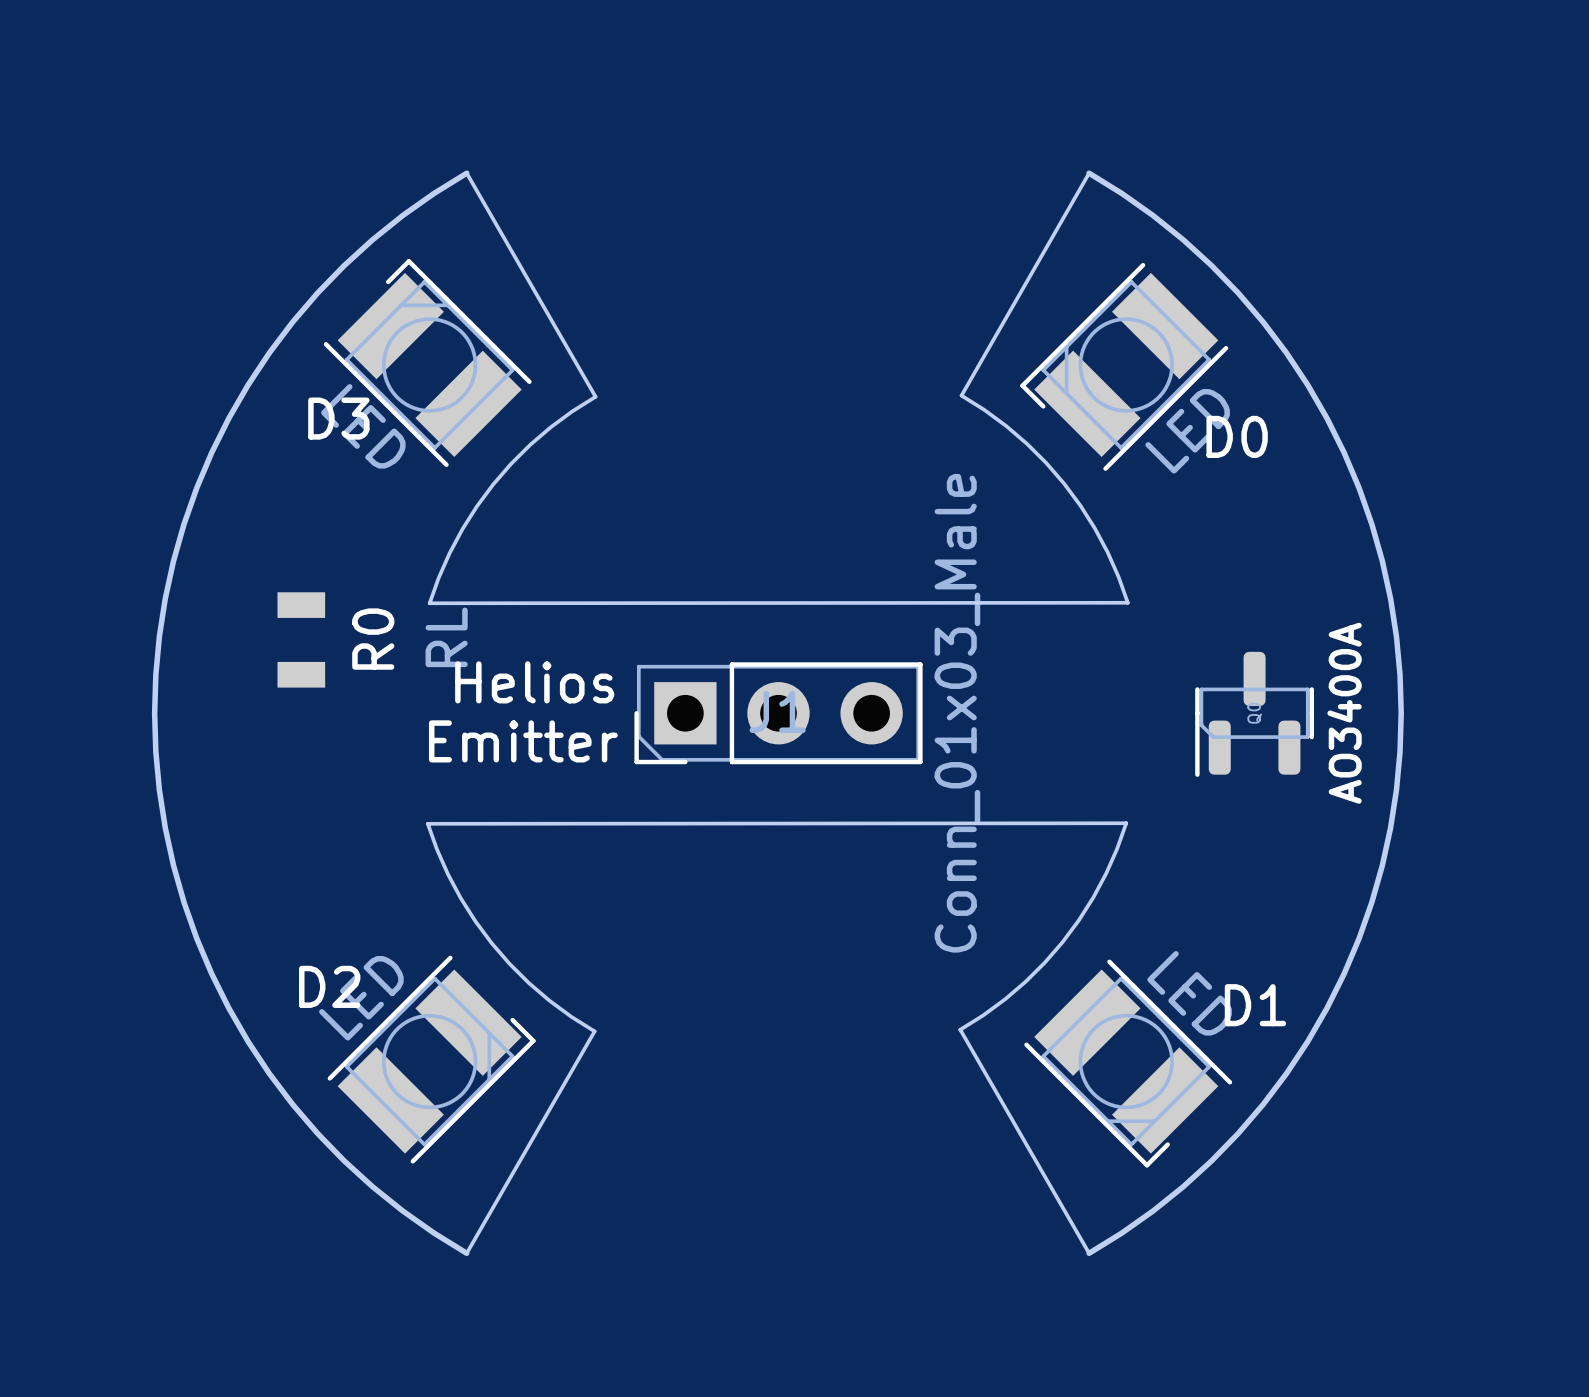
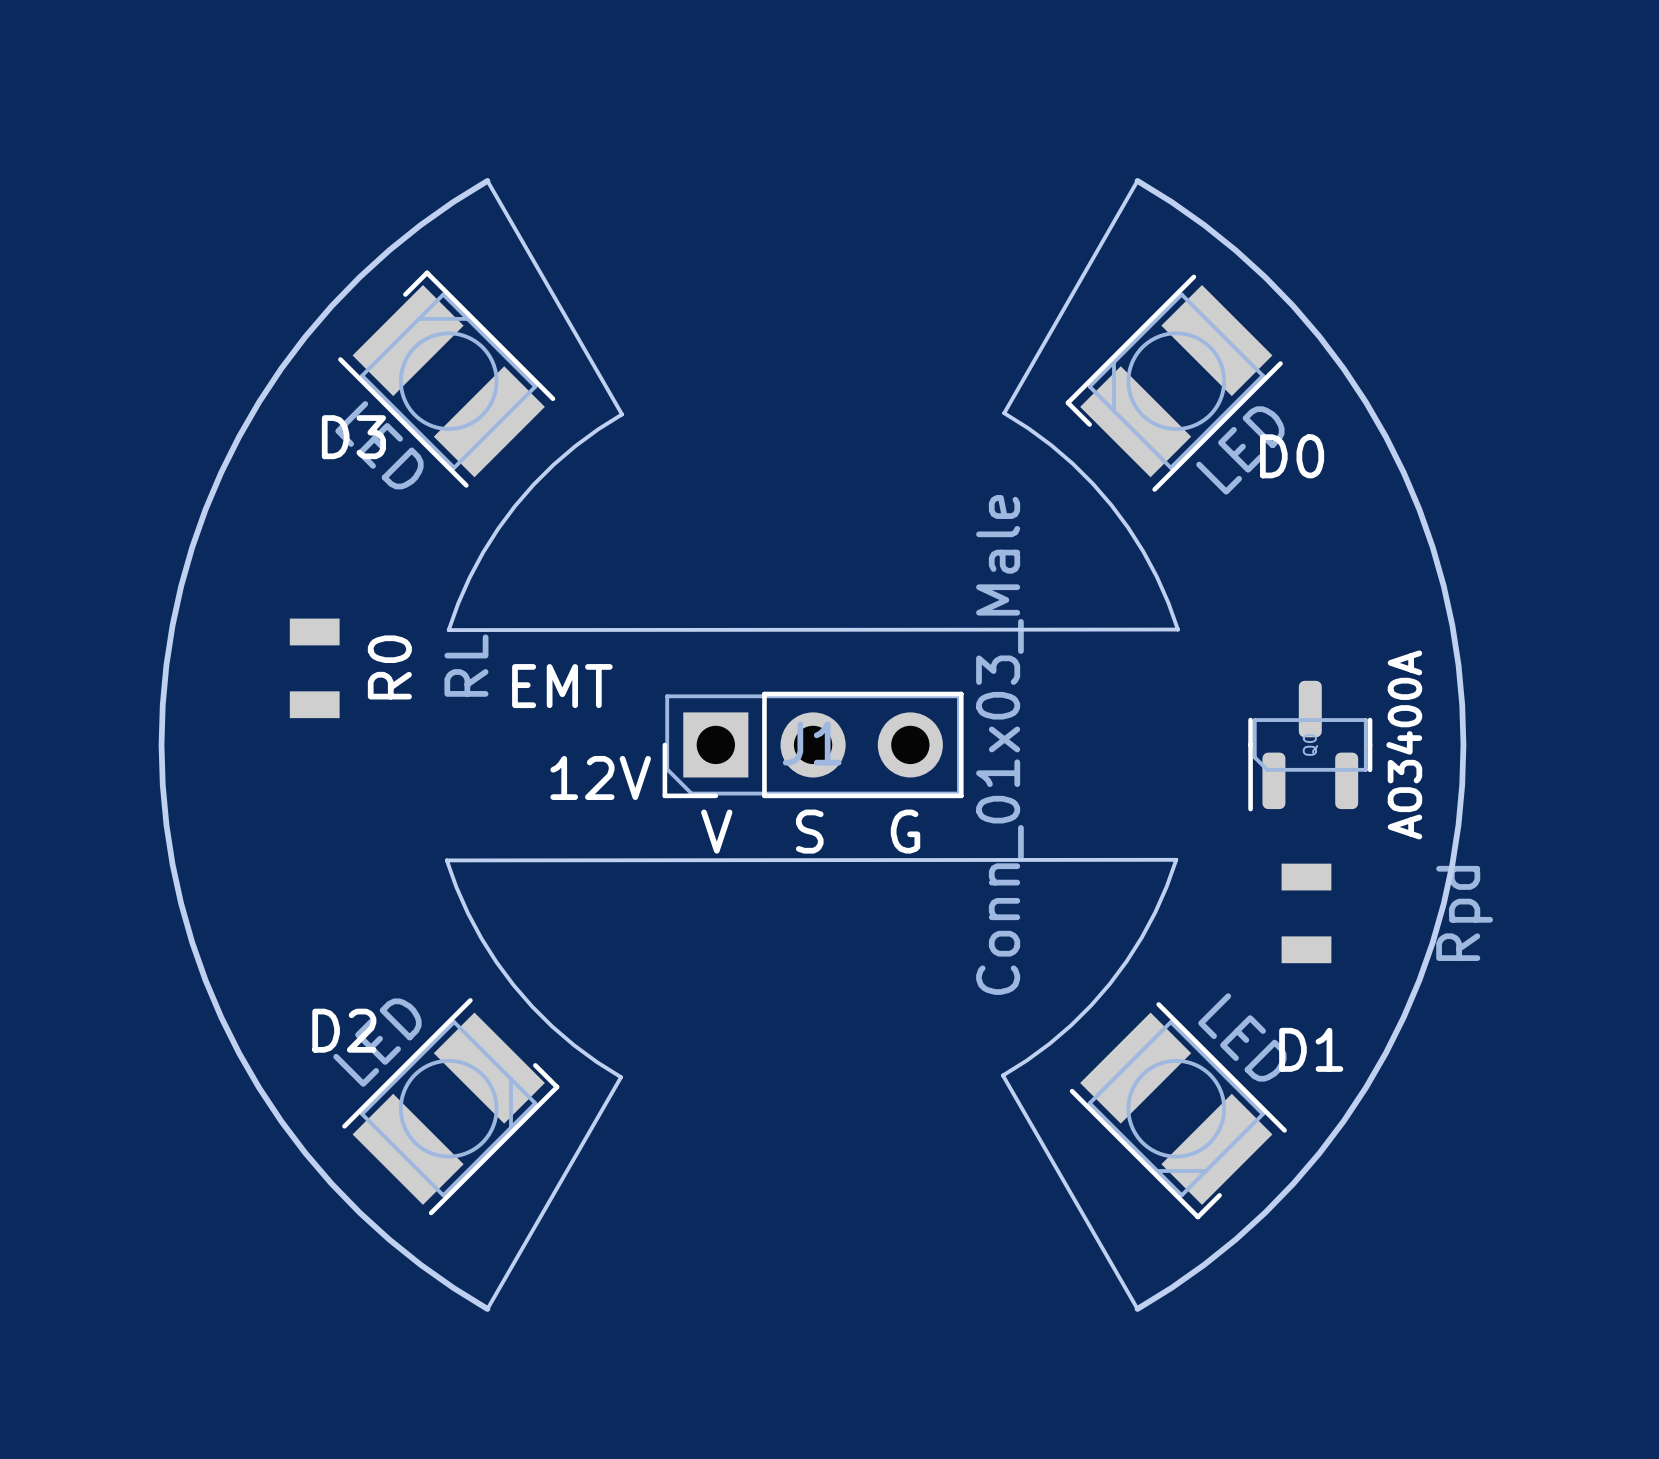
text: none -> EMT (562, 686)
text: Helios (534, 682) -> none
text: Emitter (523, 741) -> 12V (600, 777)
text: none -> V S G (810, 831)
part: none -> Rpd (1306, 913)

